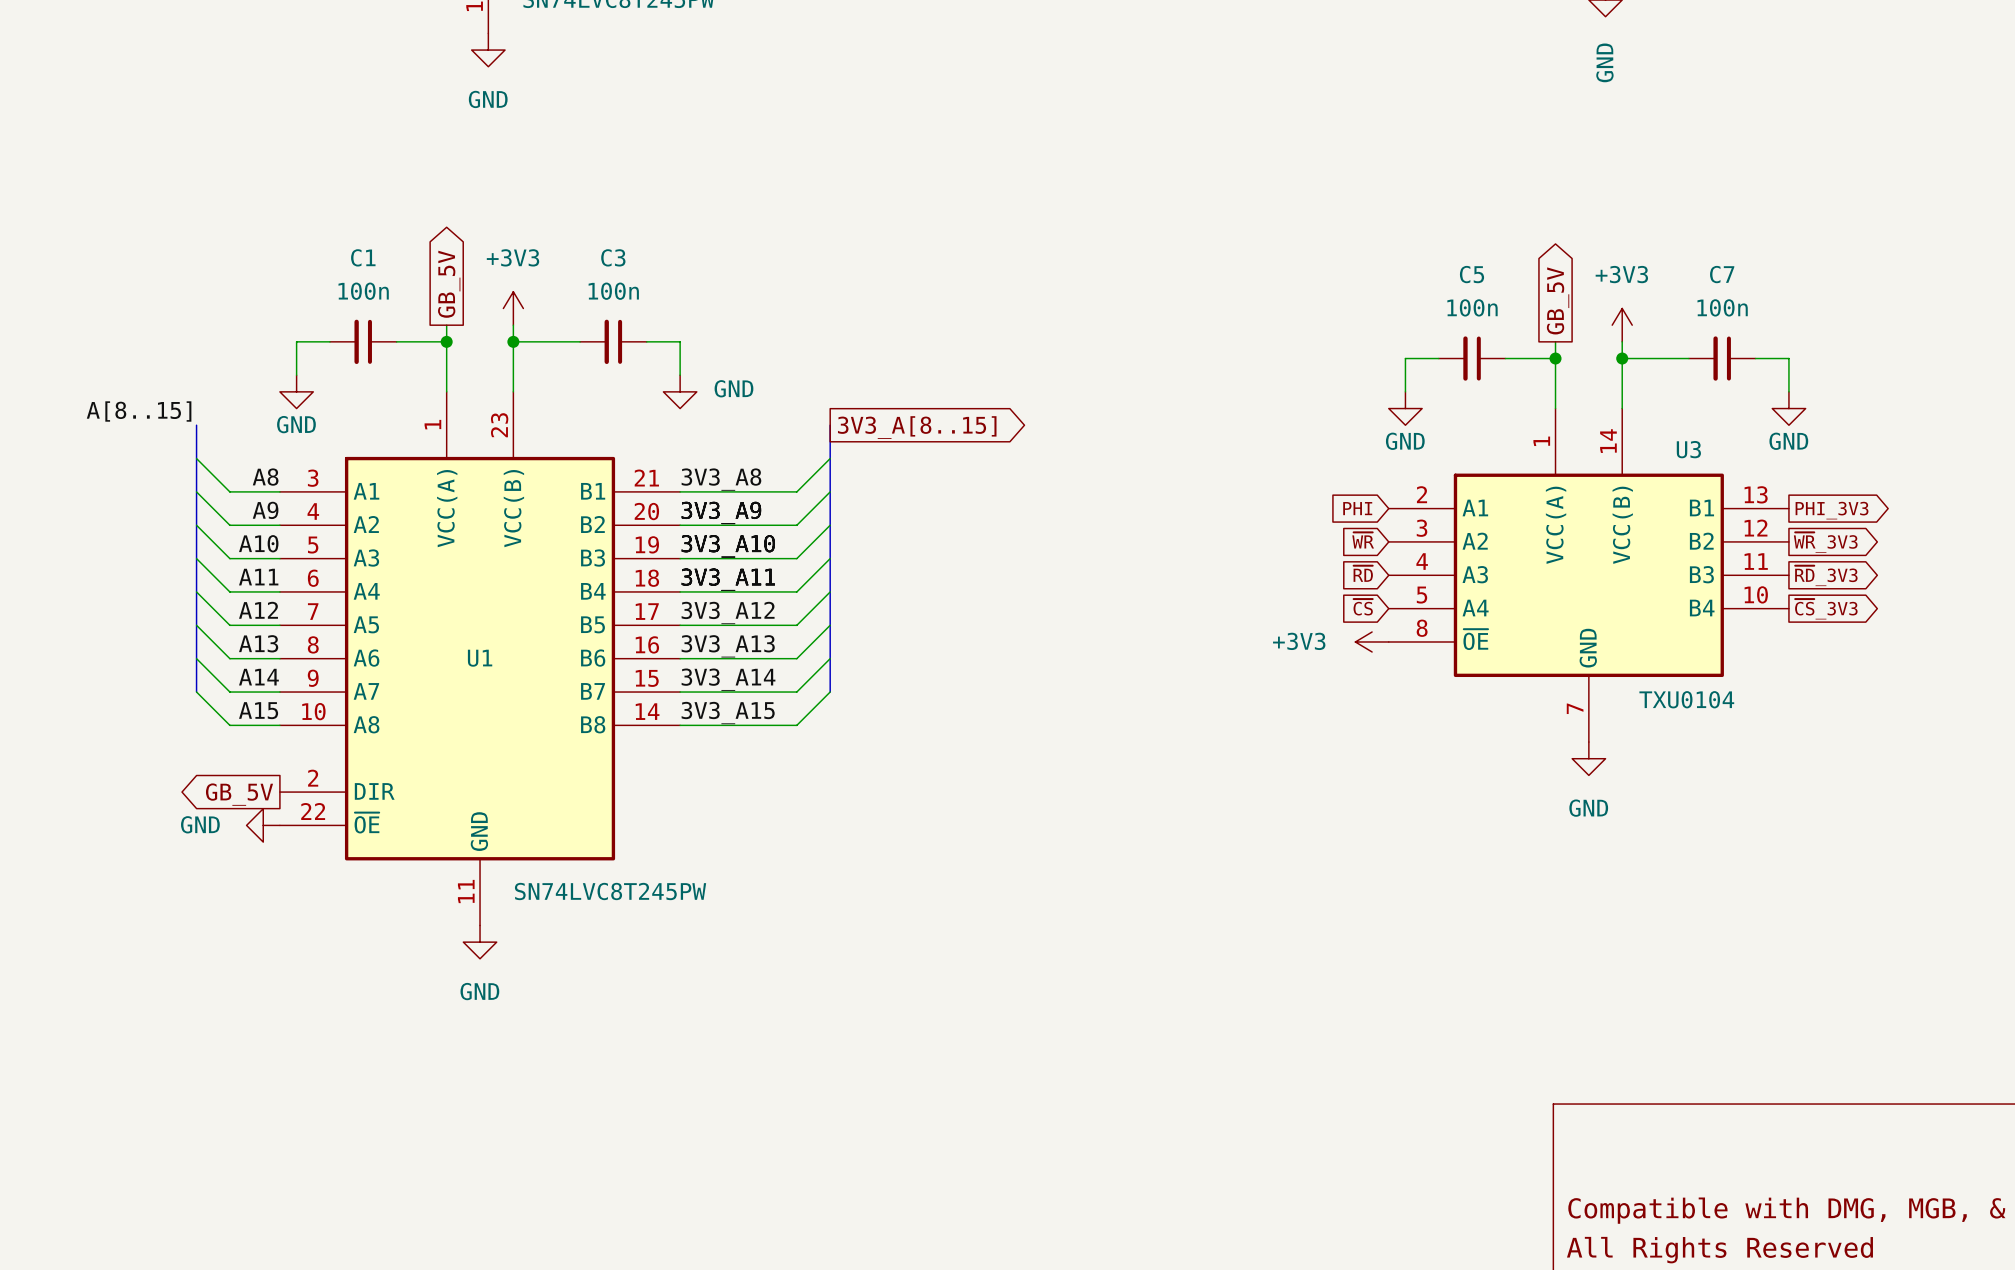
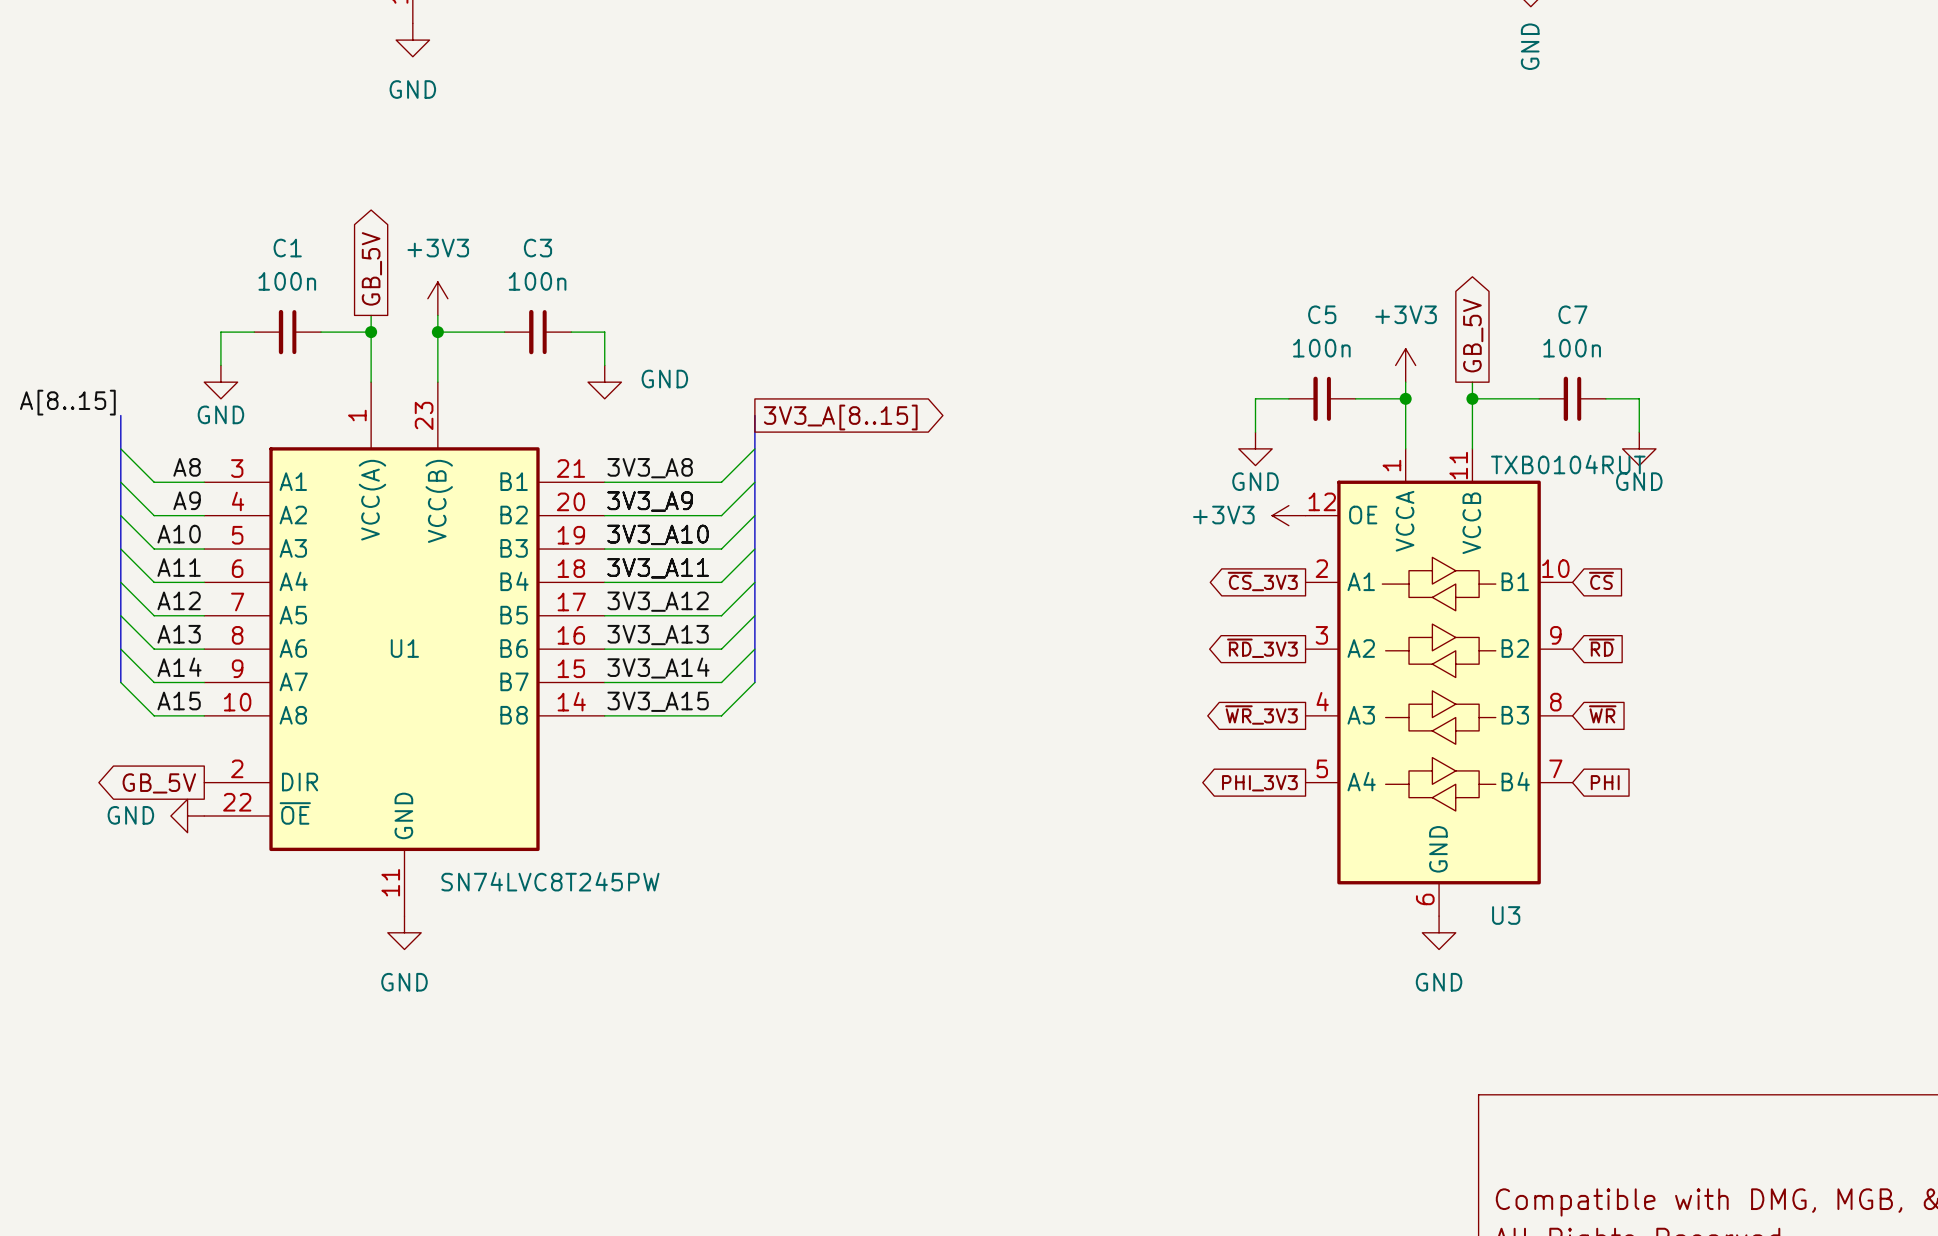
global label position: GB_5V (1558, 300) -> GB_5V (1473, 335)
power symbol: +3V3 (1622, 325) -> none
wire: (1555, 341) (1555, 408) -> (1405, 382) (1405, 448)
wire: (1622, 341) (1622, 408) -> (1472, 382) (1472, 448)
wire: (1438, 358) (1405, 358) (1405, 391) -> (1288, 398) (1255, 398) (1255, 432)
C5 position: (1472, 358) -> (1322, 398)
wire: (1505, 358) (1555, 358) -> (1355, 398) (1405, 398)
junction: (1555, 358) -> none
wire: (1622, 358) (1688, 358) -> (1472, 398) (1539, 398)
junction: (1622, 358) -> none
C7 position: (1722, 358) -> (1572, 398)
wire: (1755, 358) (1788, 358) (1788, 391) -> (1605, 398) (1639, 398) (1639, 432)
power symbol: none -> +3V3 (1405, 365)
U3 symbol: [1388, 408, 1789, 743] -> [1305, 448, 1573, 917]
power symbol position: GND (1405, 408) -> GND (1255, 448)
junction: none -> (1405, 398)
junction: none -> (1472, 398)
power symbol position: GND (1788, 408) -> GND (1639, 448)
U3 name position: U3 (1688, 449) -> U3 (1506, 915)
global label: PHI (1357, 508) -> none
global label: PHI_3V3 (1832, 510) -> none
global label rotation: 0° (1363, 540) -> 180° (1602, 714)
global label position: ~{WR} (1363, 540) -> ~{WR} (1602, 714)
global label: ~{WR}_3V3 (1825, 542) -> none
global label rotation: 0° (1363, 573) -> 180° (1601, 647)
global label position: ~{RD} (1363, 573) -> ~{RD} (1601, 647)
global label: ~{RD}_3V3 (1826, 575) -> none
global label: none -> ~{CS}_3V3 (1262, 581)
global label rotation: 0° (1363, 607) -> 180° (1601, 580)
global label position: ~{CS} (1363, 607) -> ~{CS} (1601, 580)
global label: ~{CS}_3V3 (1826, 609) -> none
power symbol position: +3V3 (1372, 641) -> +3V3 (1288, 515)
global label: none -> ~{RD}_3V3 (1262, 648)
U3 value: TXU0104 (1686, 699) -> TXB0104RUT (1568, 464)
global label: none -> ~{WR}_3V3 (1261, 714)
power symbol: GND (1588, 758) -> none
global label: none -> PHI (1605, 782)
global label: none -> PHI_3V3 (1259, 783)
power symbol: none -> GND (1439, 932)

